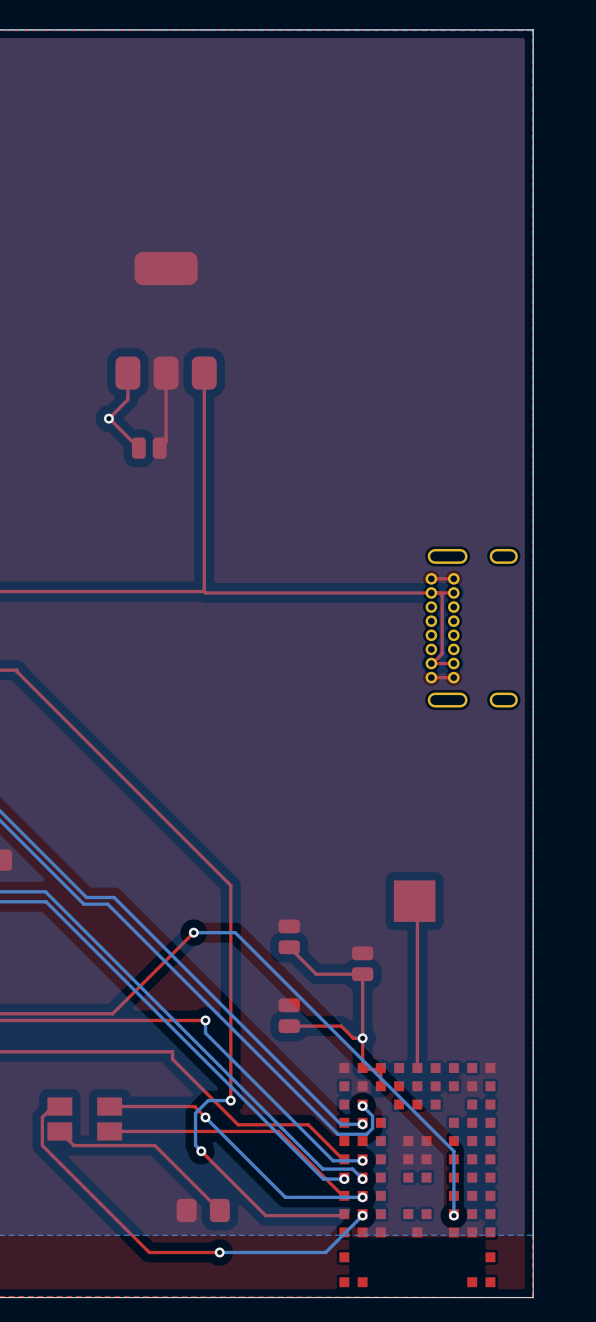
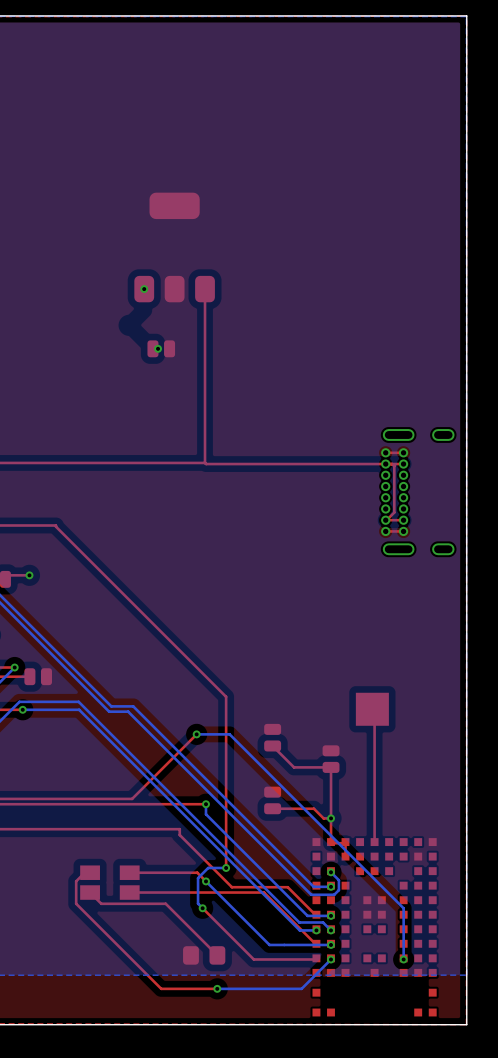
top track: (127, 373) (127, 399) (108, 418) (138, 448) -> none
via: none -> (144, 289)
top track: (166, 373) (166, 441) (159, 448) -> none
via: (108, 418) -> none
via: none -> (158, 348)

